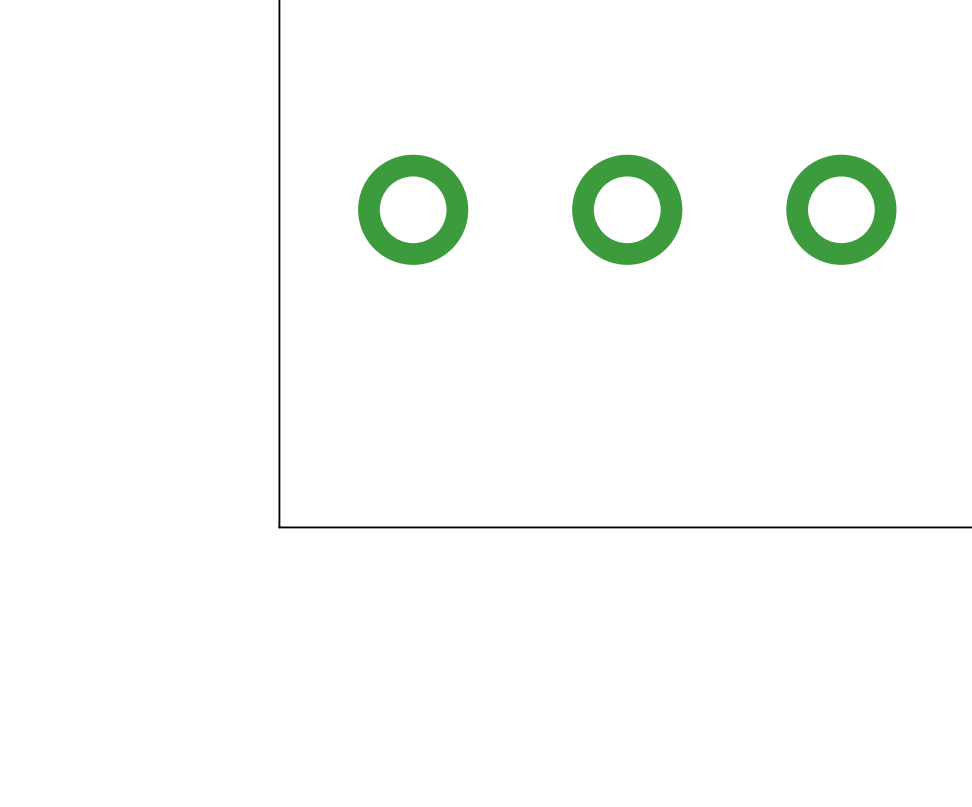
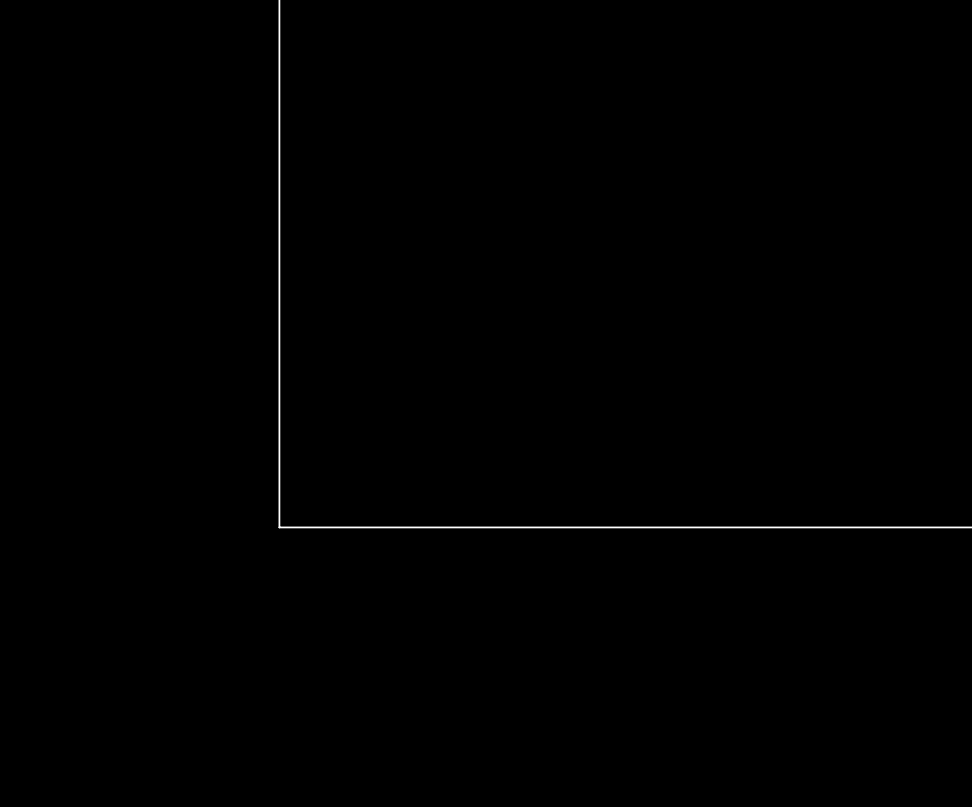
part: (627, 209) -> none

